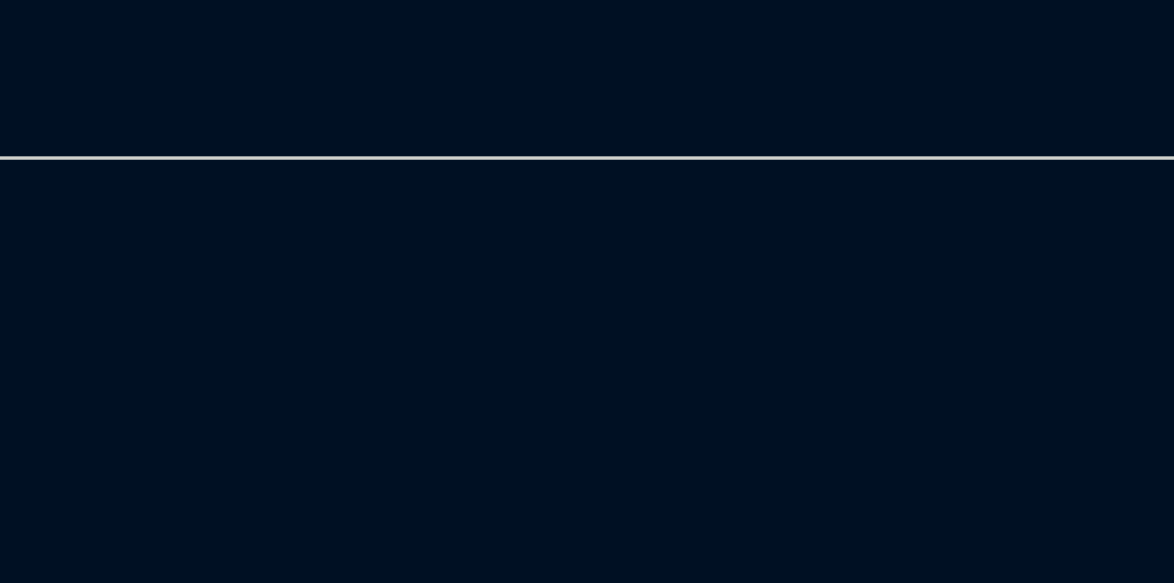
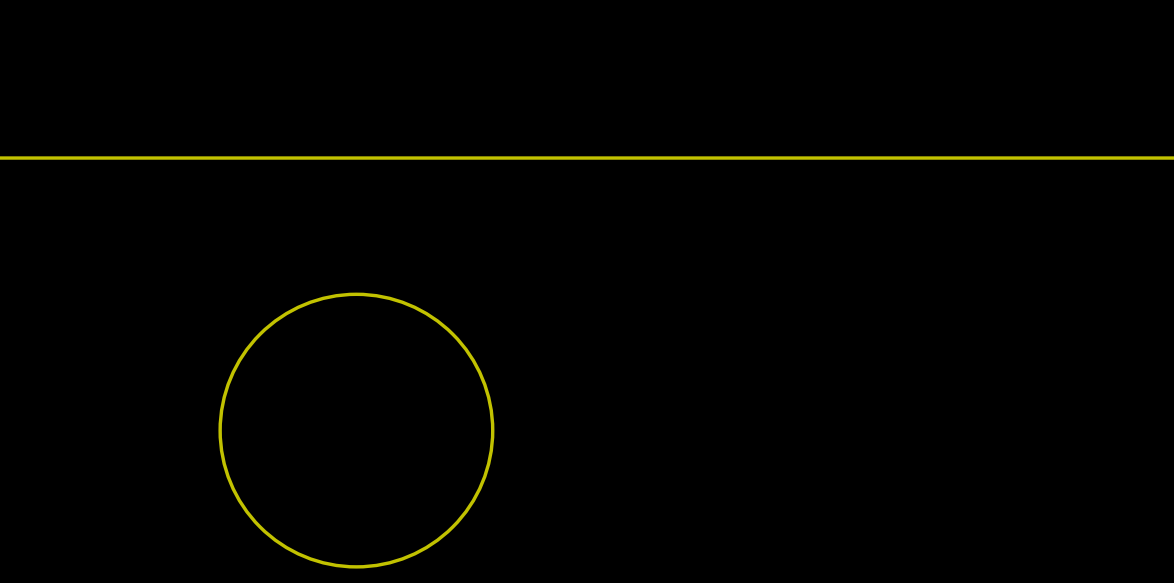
round board edge: none -> [218, 292, 495, 569]

